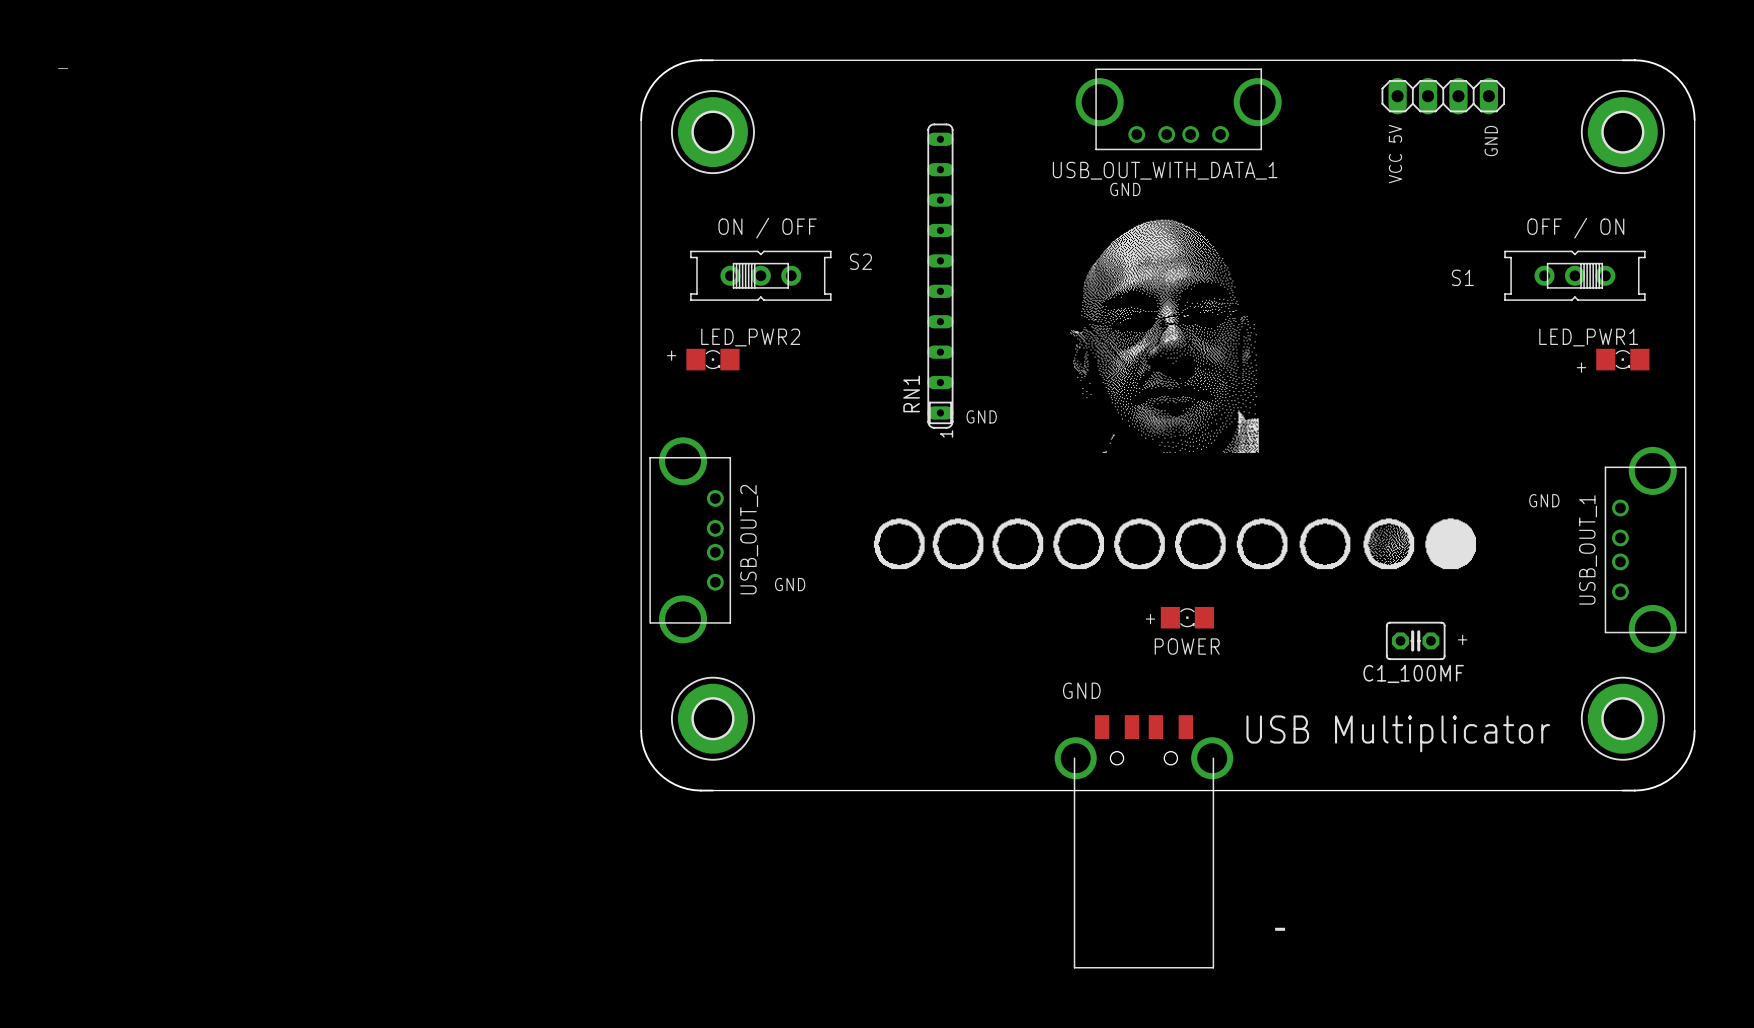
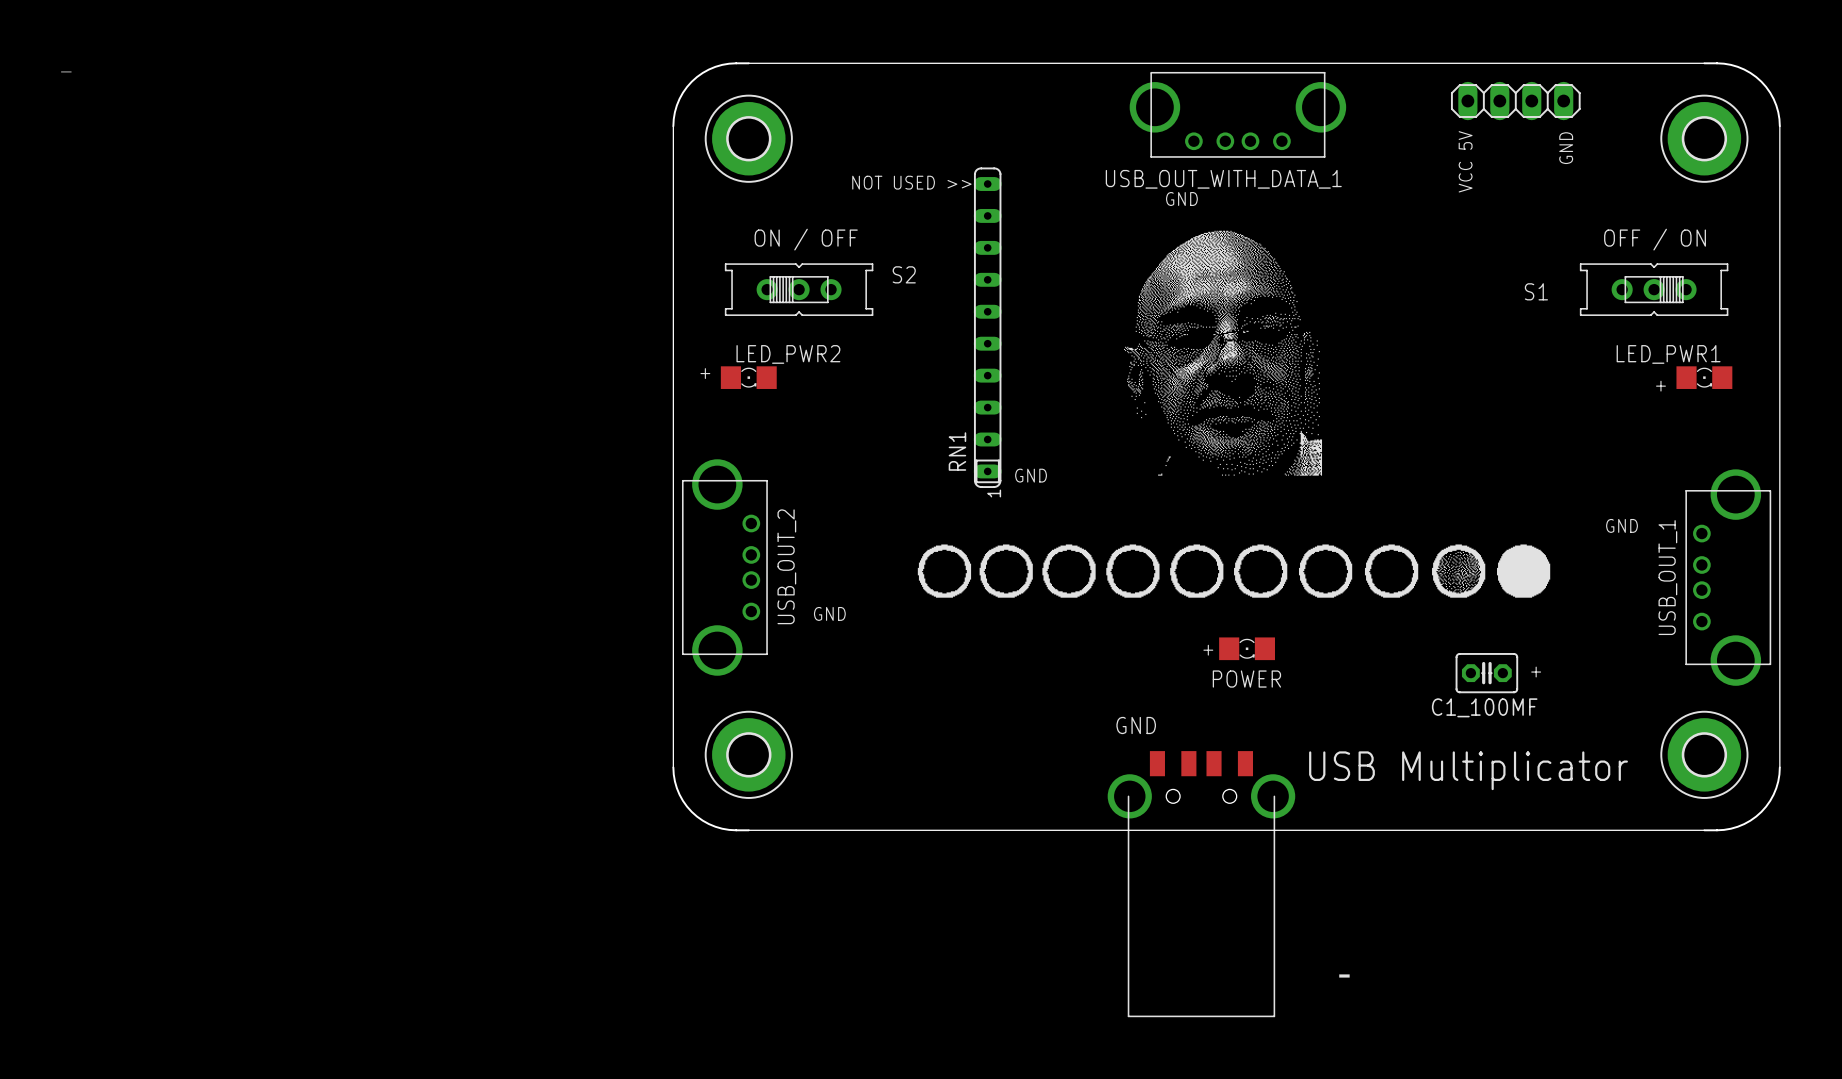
text: none -> NOT USED >> (911, 182)
RN1 position: (940, 276) -> (987, 327)
text position: GND (981, 416) -> GND (1031, 475)

